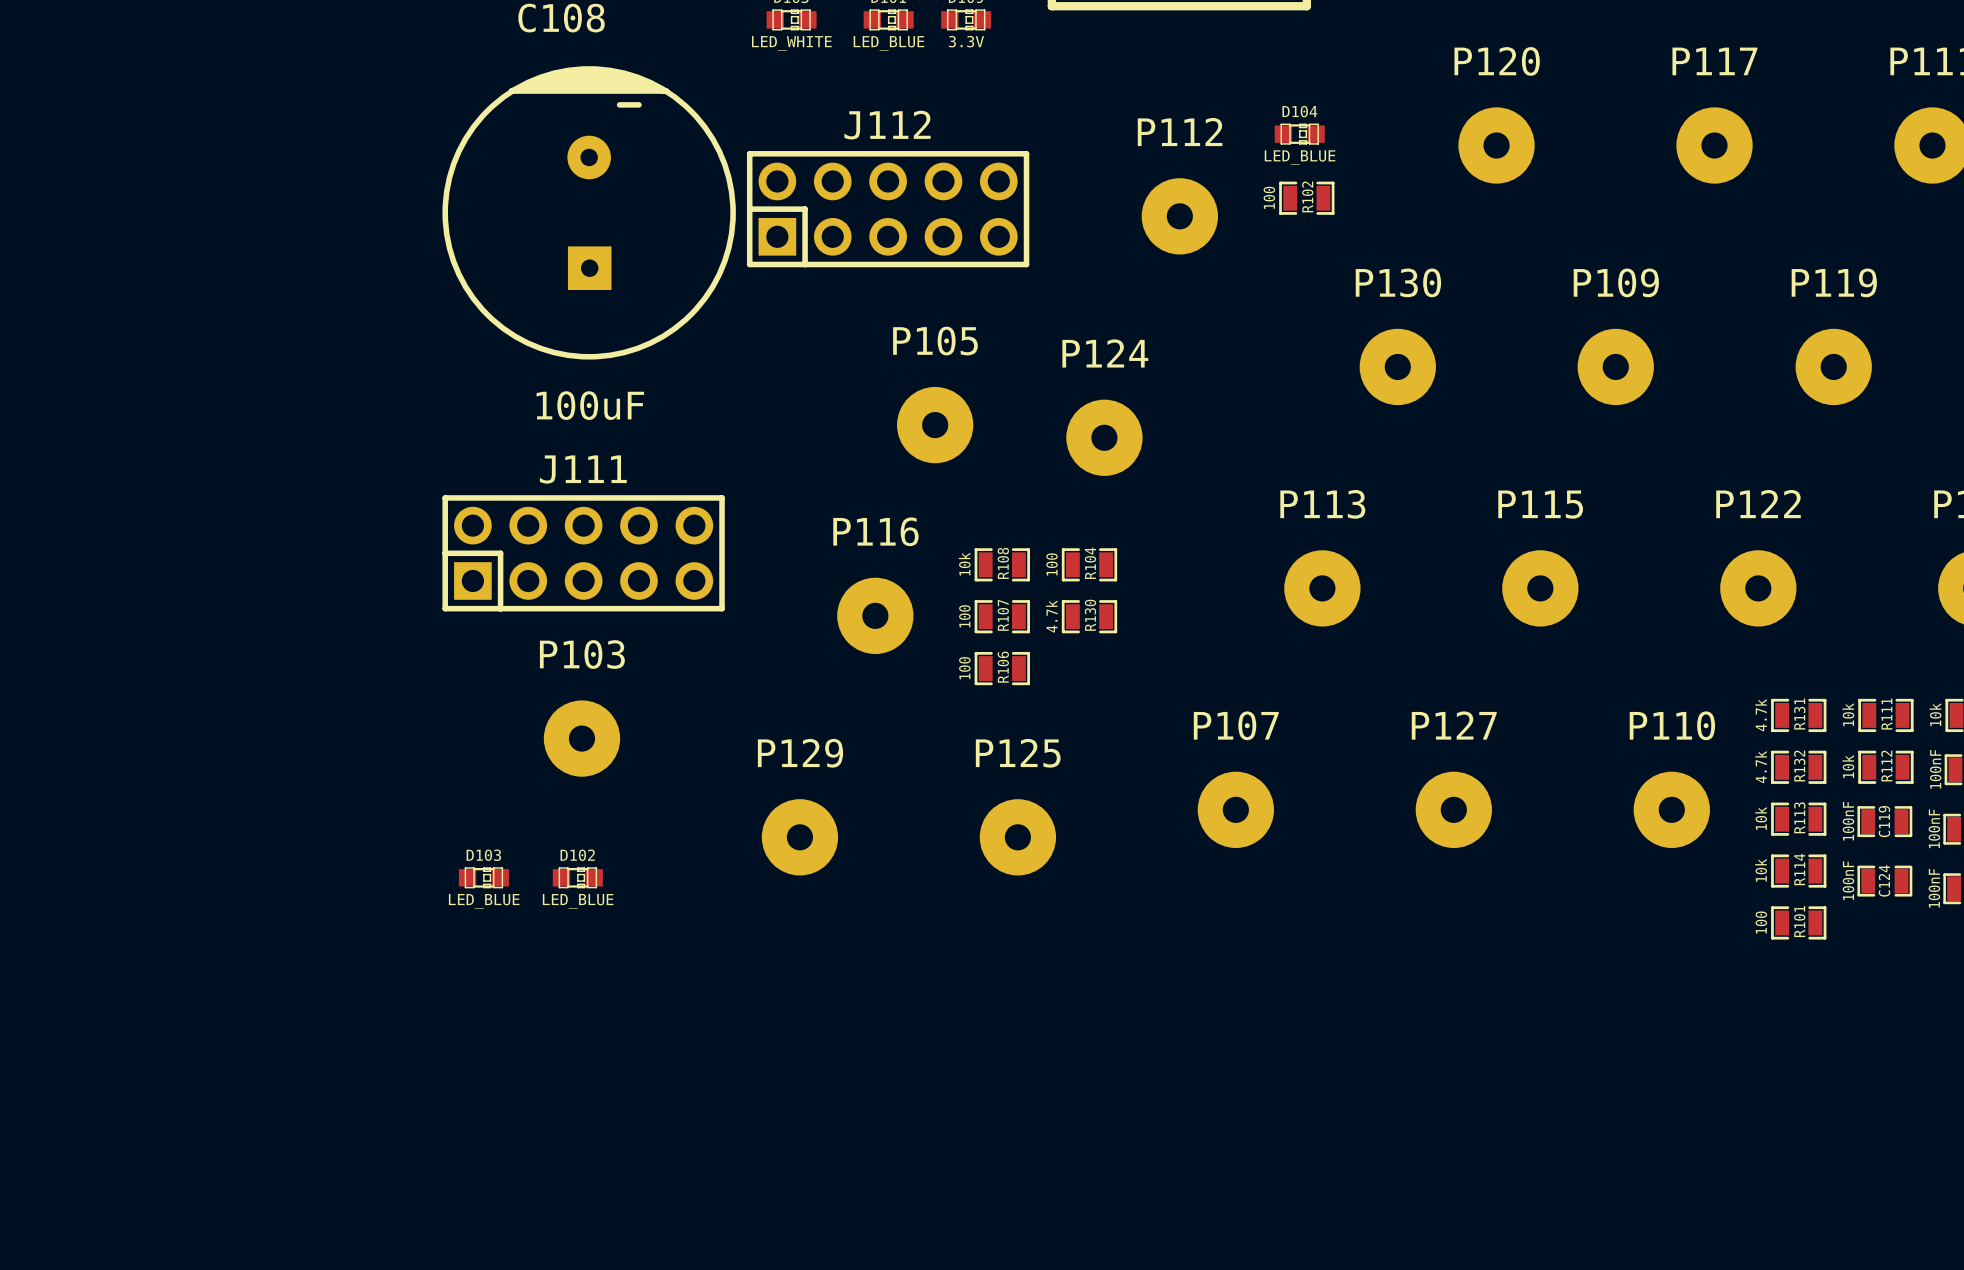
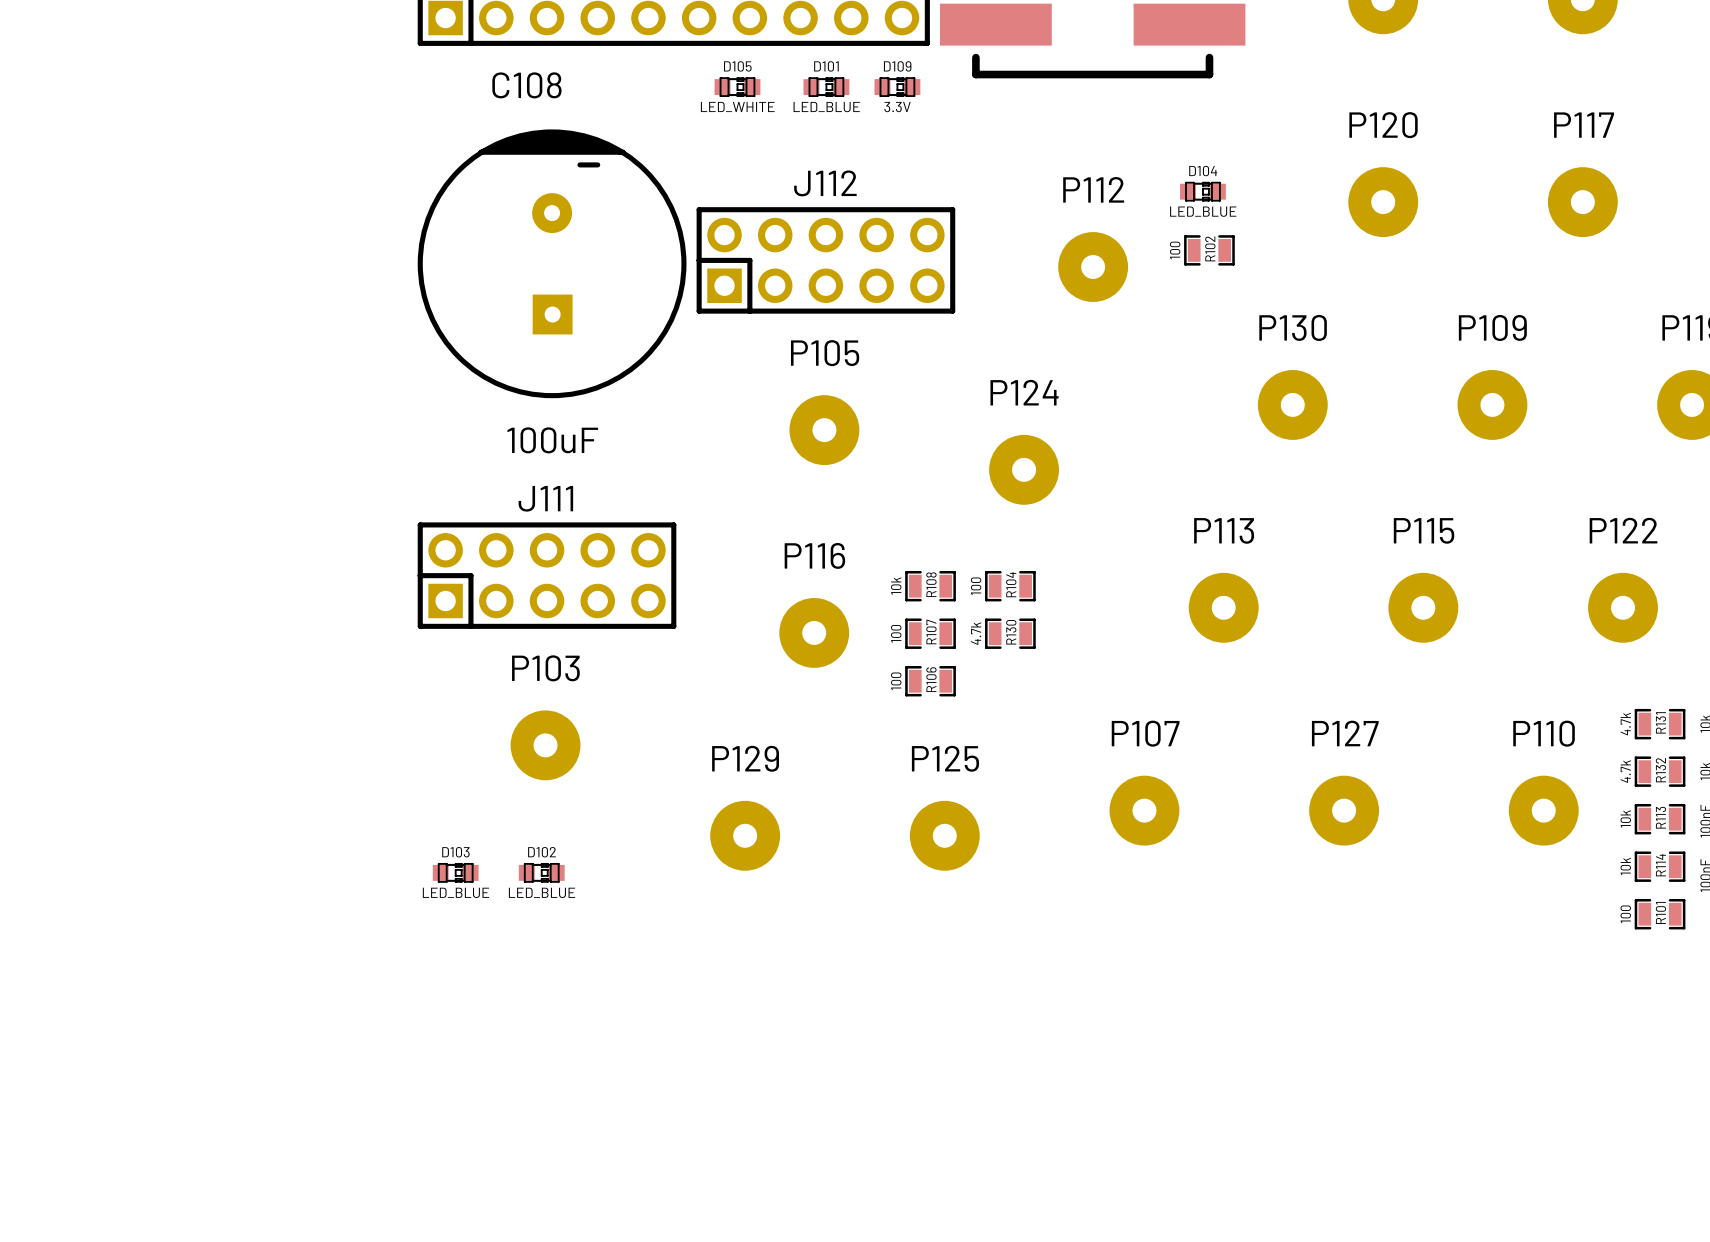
P105 position: (935, 425) -> (824, 430)

